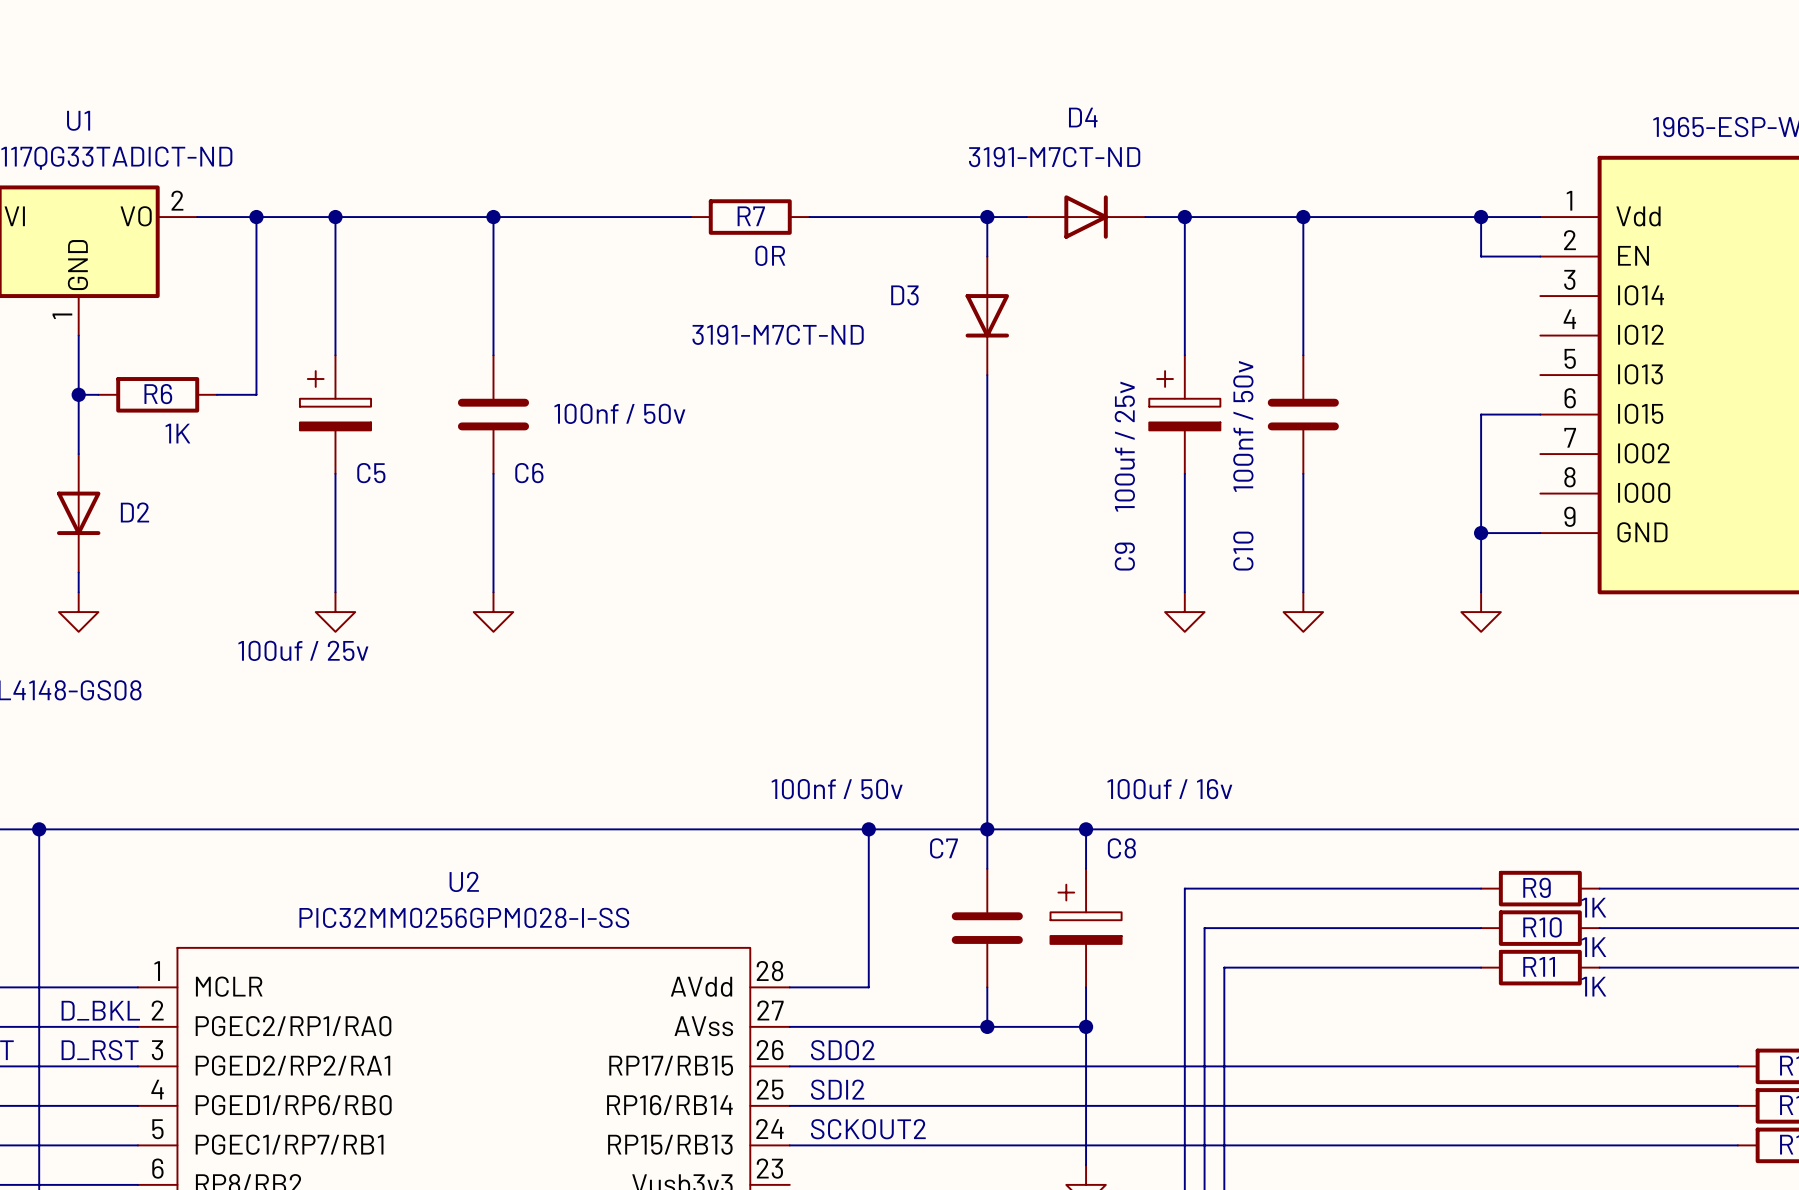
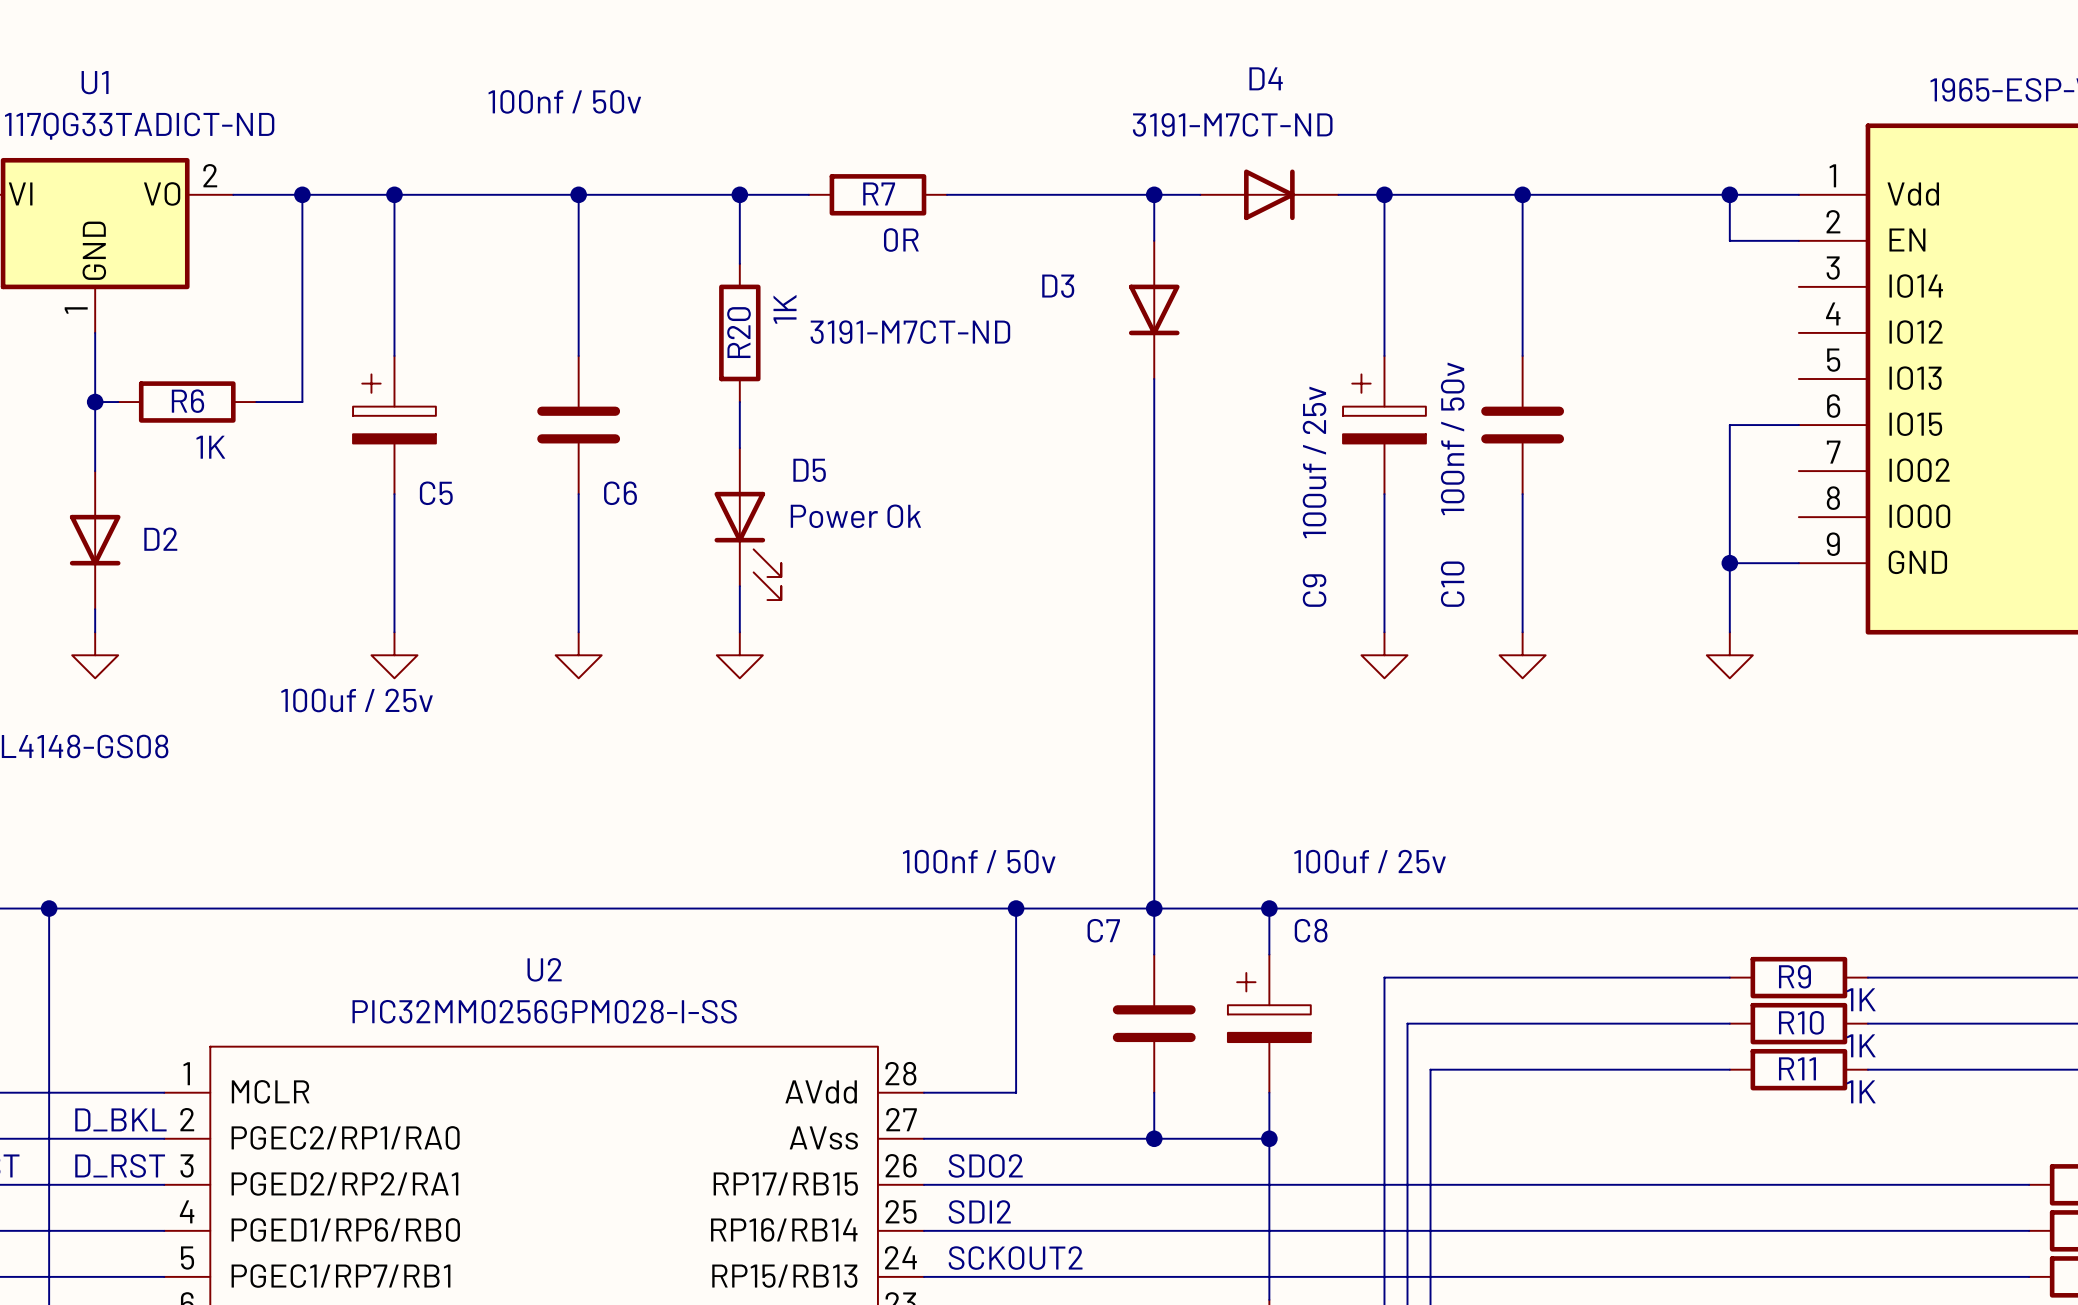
wire: none -> (739, 194) (739, 263)
junction: none -> (739, 194)
R20: none -> 1K (739, 332)
wire: none -> (739, 402) (739, 448)
C6 value position: 100nf / 50v (619, 413) -> 100nf / 50v (564, 101)
D5: none -> Power Ok (747, 524)
wire: none -> (739, 586) (739, 632)
power symbol: none -> (739, 655)
C8 value: 100uf / 16v (1169, 789) -> 100uf / 25v (1370, 861)

